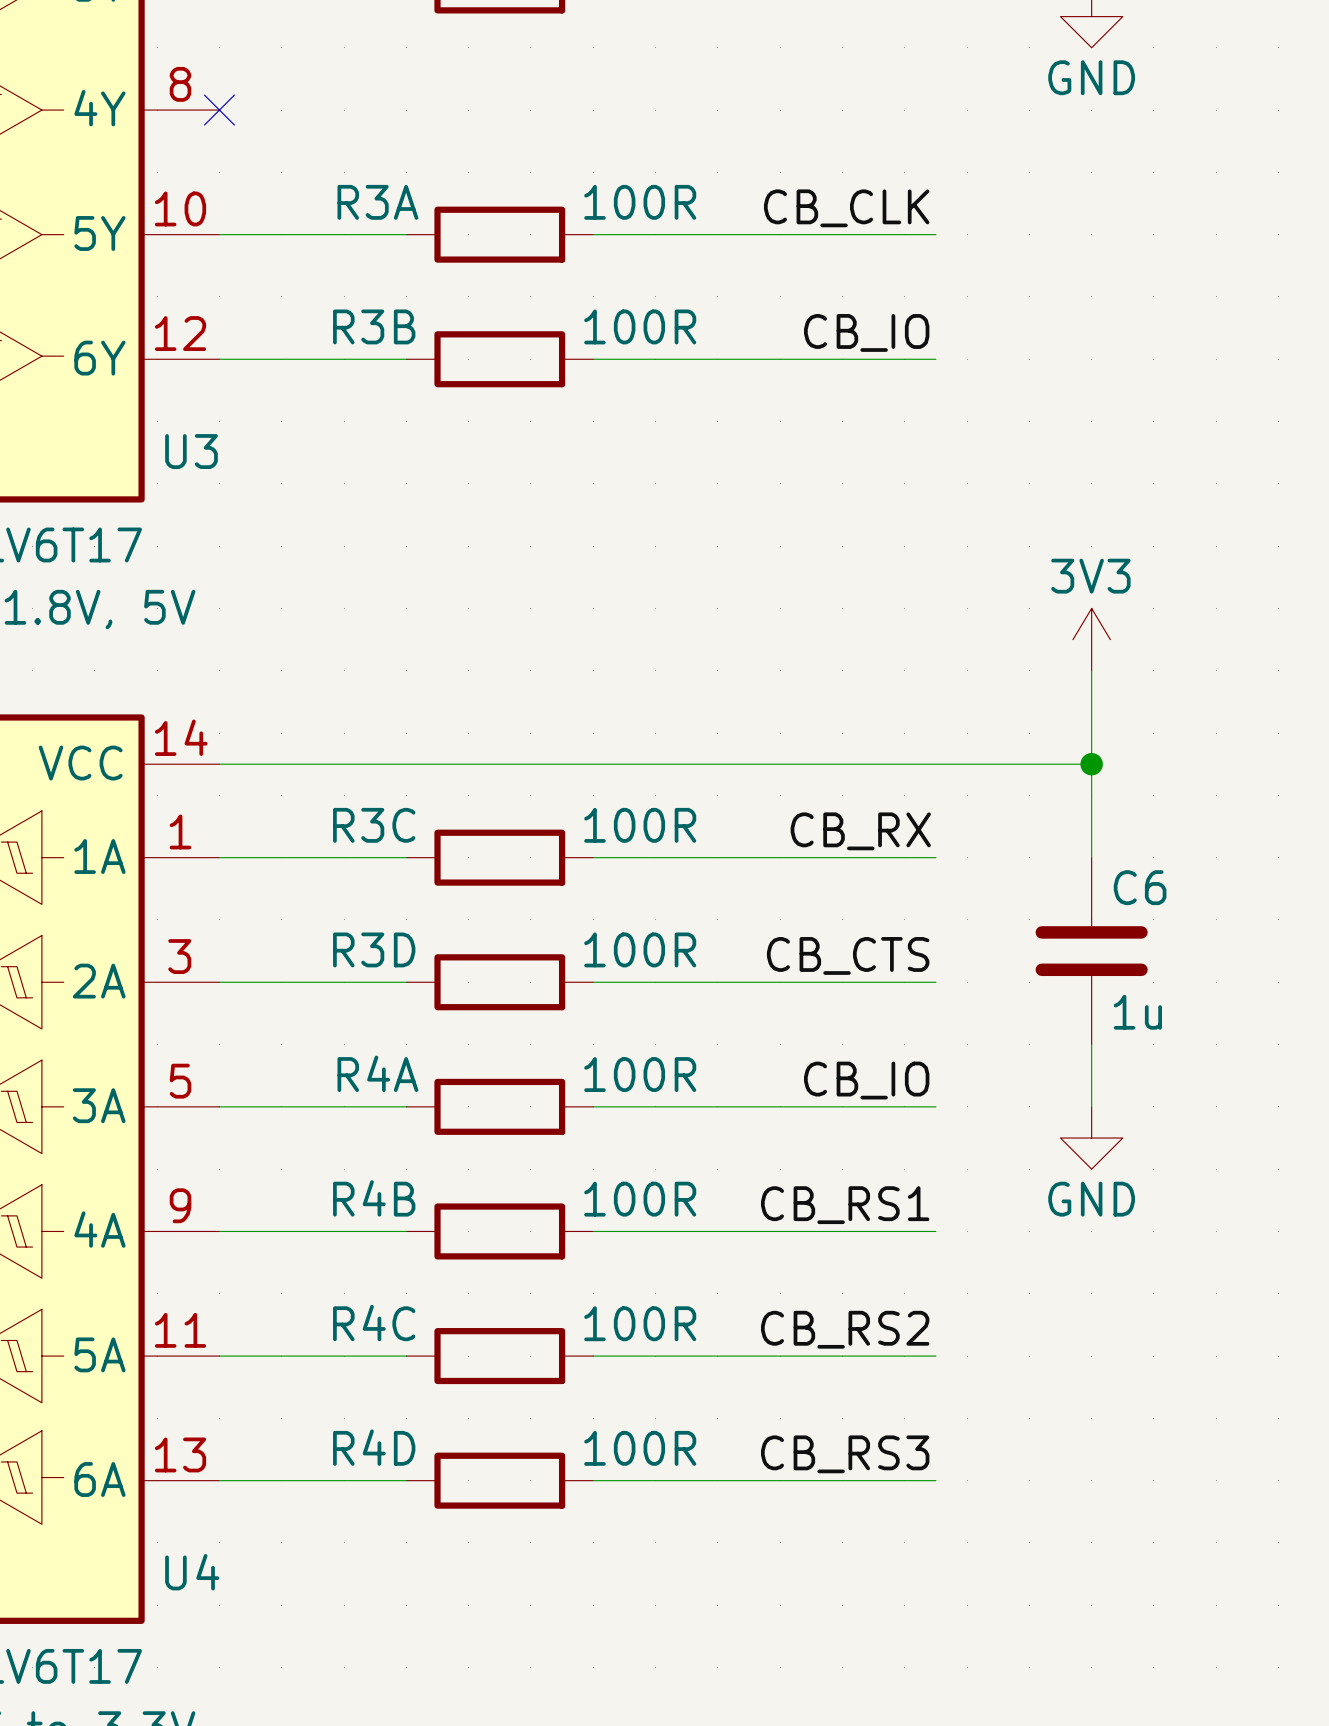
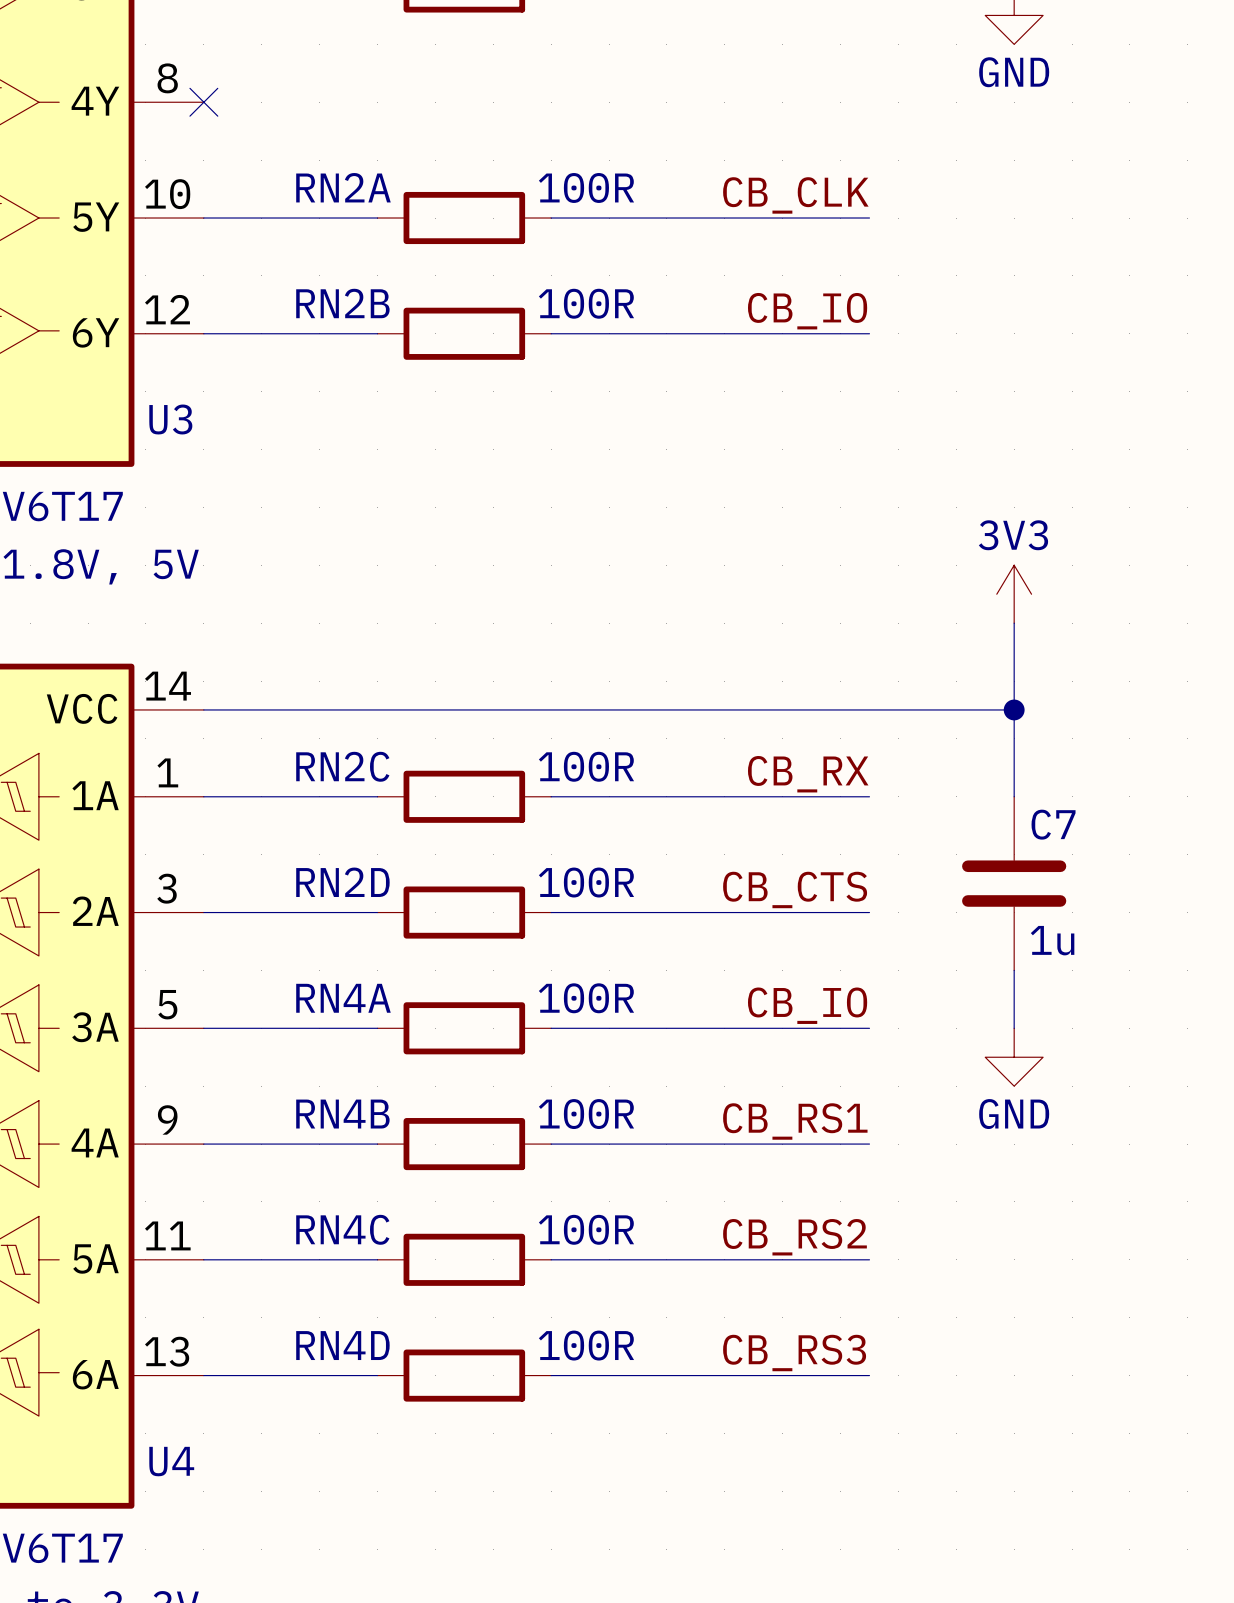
R3A name: R3A (377, 202) -> RN2A (343, 187)
R3B name: R3B (374, 326) -> RN2B (342, 303)
R3C name: R3C (374, 825) -> RN2C (342, 766)
C6 name: C6 (1140, 887) -> C7 (1053, 824)
R3D name: R3D (374, 949) -> RN2D (342, 882)
R4A name: R4A (377, 1073) -> RN4A (343, 998)
R4B name: R4B (374, 1198) -> RN4B (342, 1114)
R4C name: R4C (374, 1323) -> RN4C (342, 1229)
R4D name: R4D (374, 1447) -> RN4D (342, 1345)

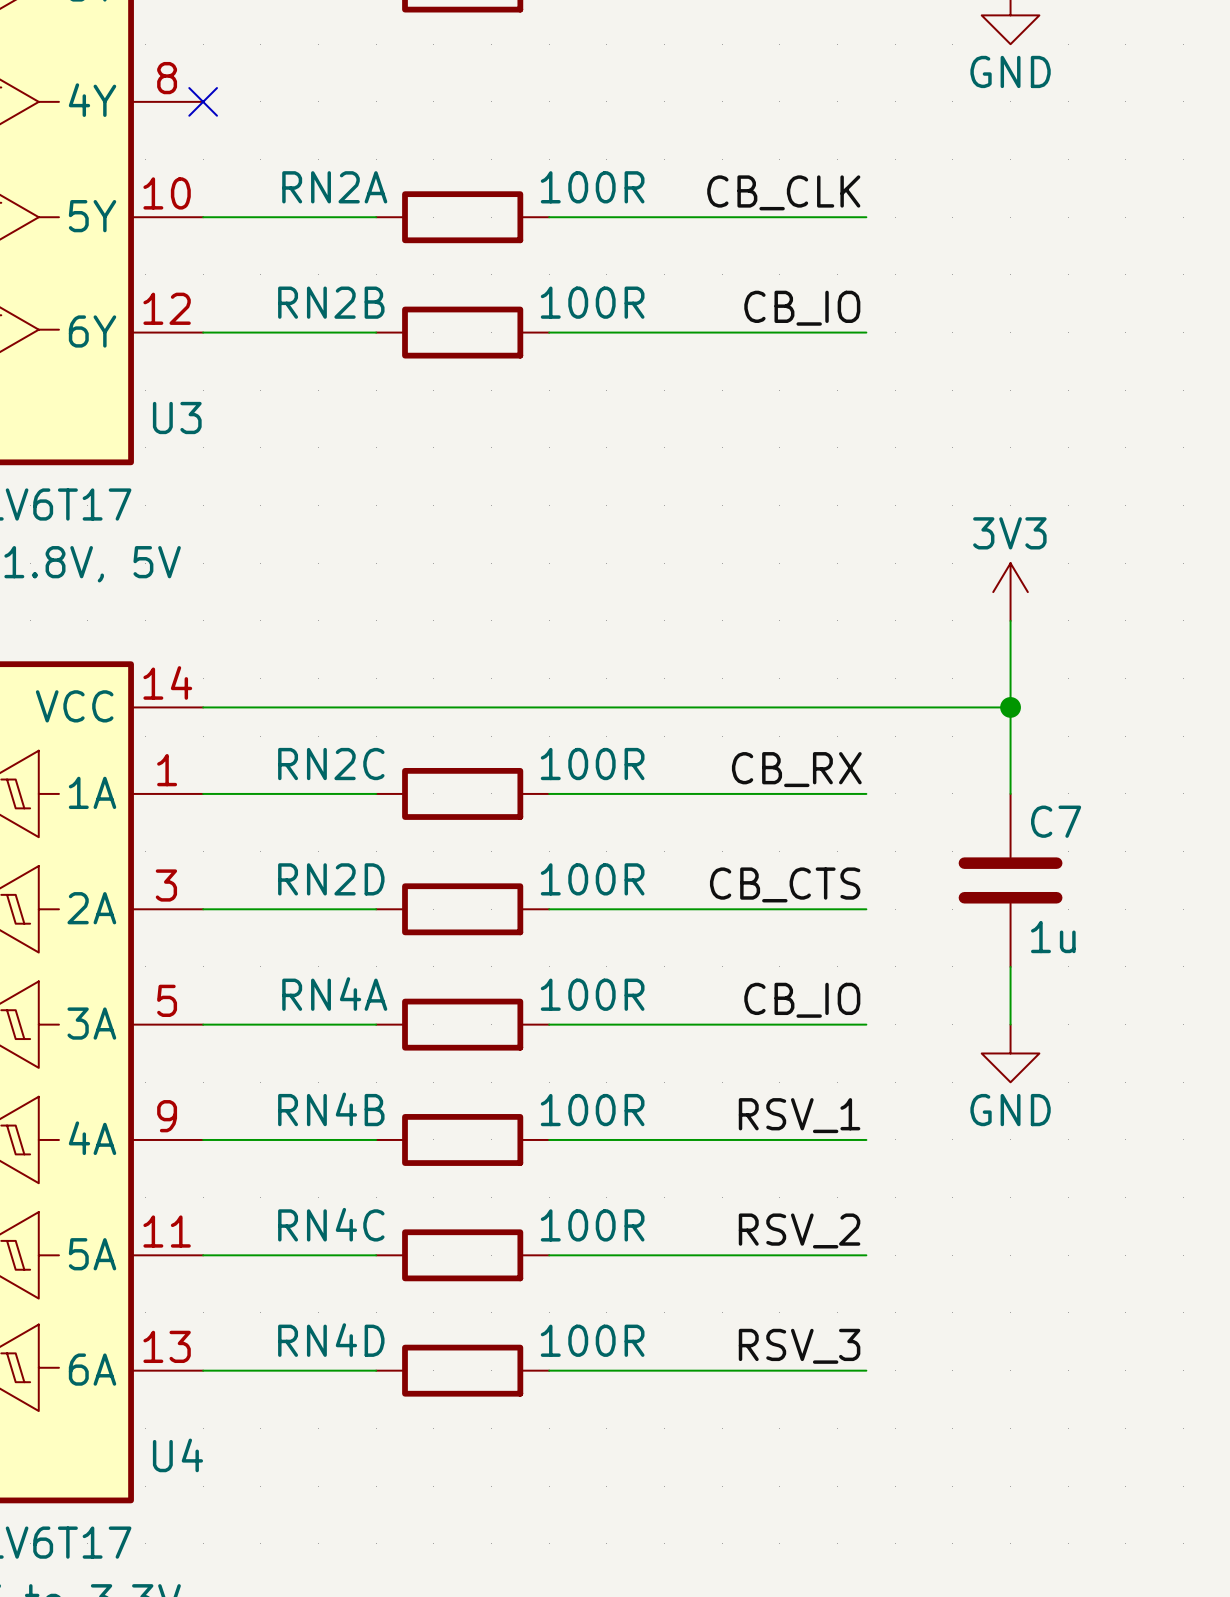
label: CB_RS1 (795, 1121) -> RSV_1 (799, 1115)
label: CB_RS2 (794, 1237) -> RSV_2 (799, 1230)
label: CB_RS3 (794, 1353) -> RSV_3 (799, 1346)

